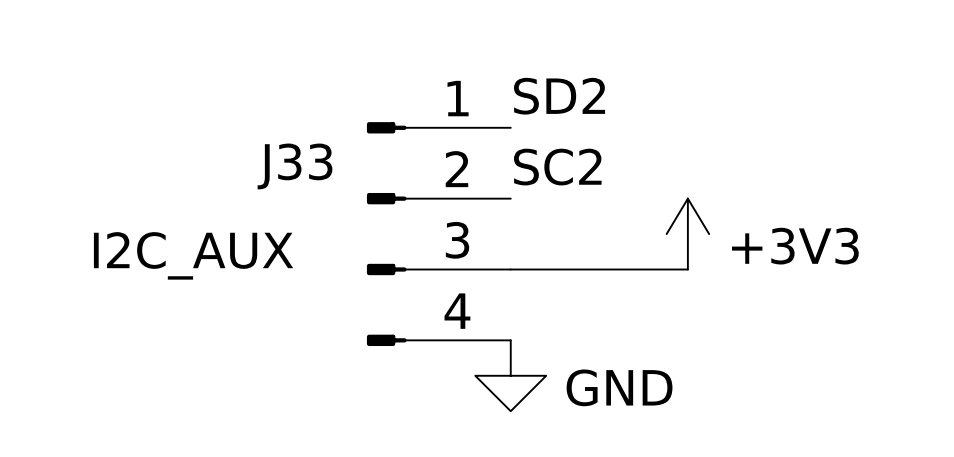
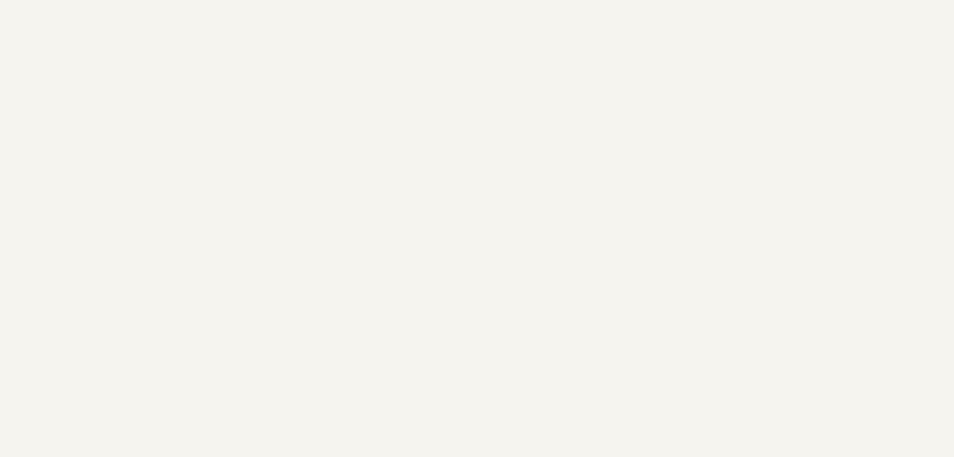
label: SD2 (559, 96) -> none
label: SC2 (557, 167) -> none
J33: I2C_AUX (438, 234) -> none
power symbol: +3V3 (687, 234) -> none
wire: (510, 269) (687, 269) -> none
power symbol: GND (510, 375) -> none

